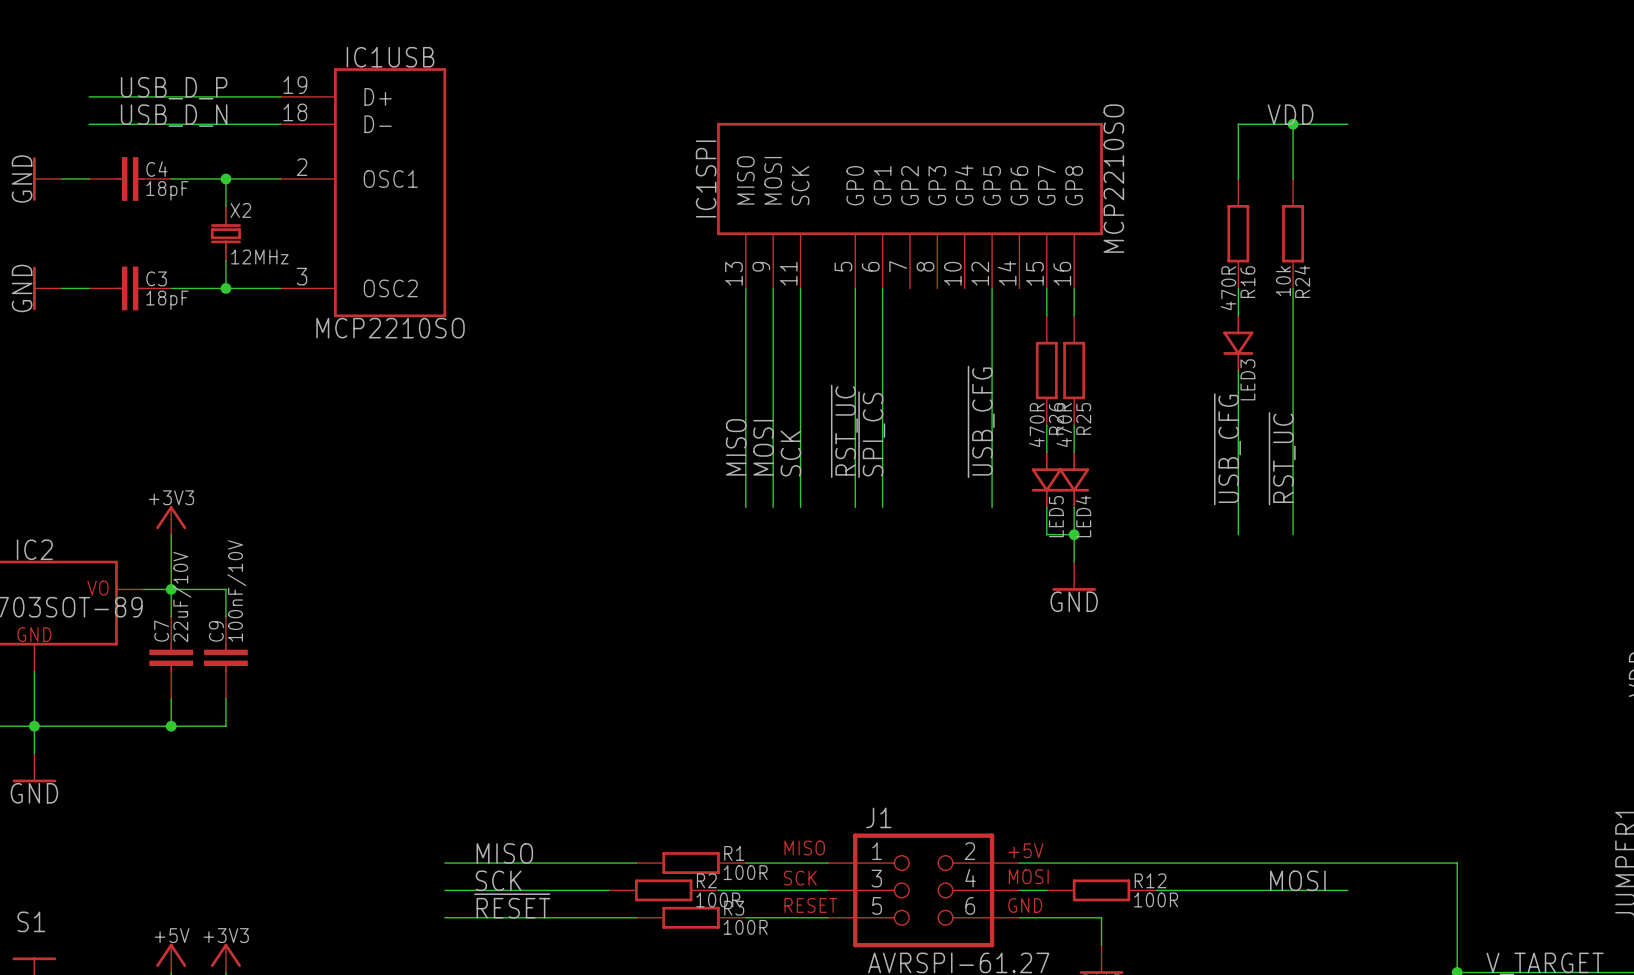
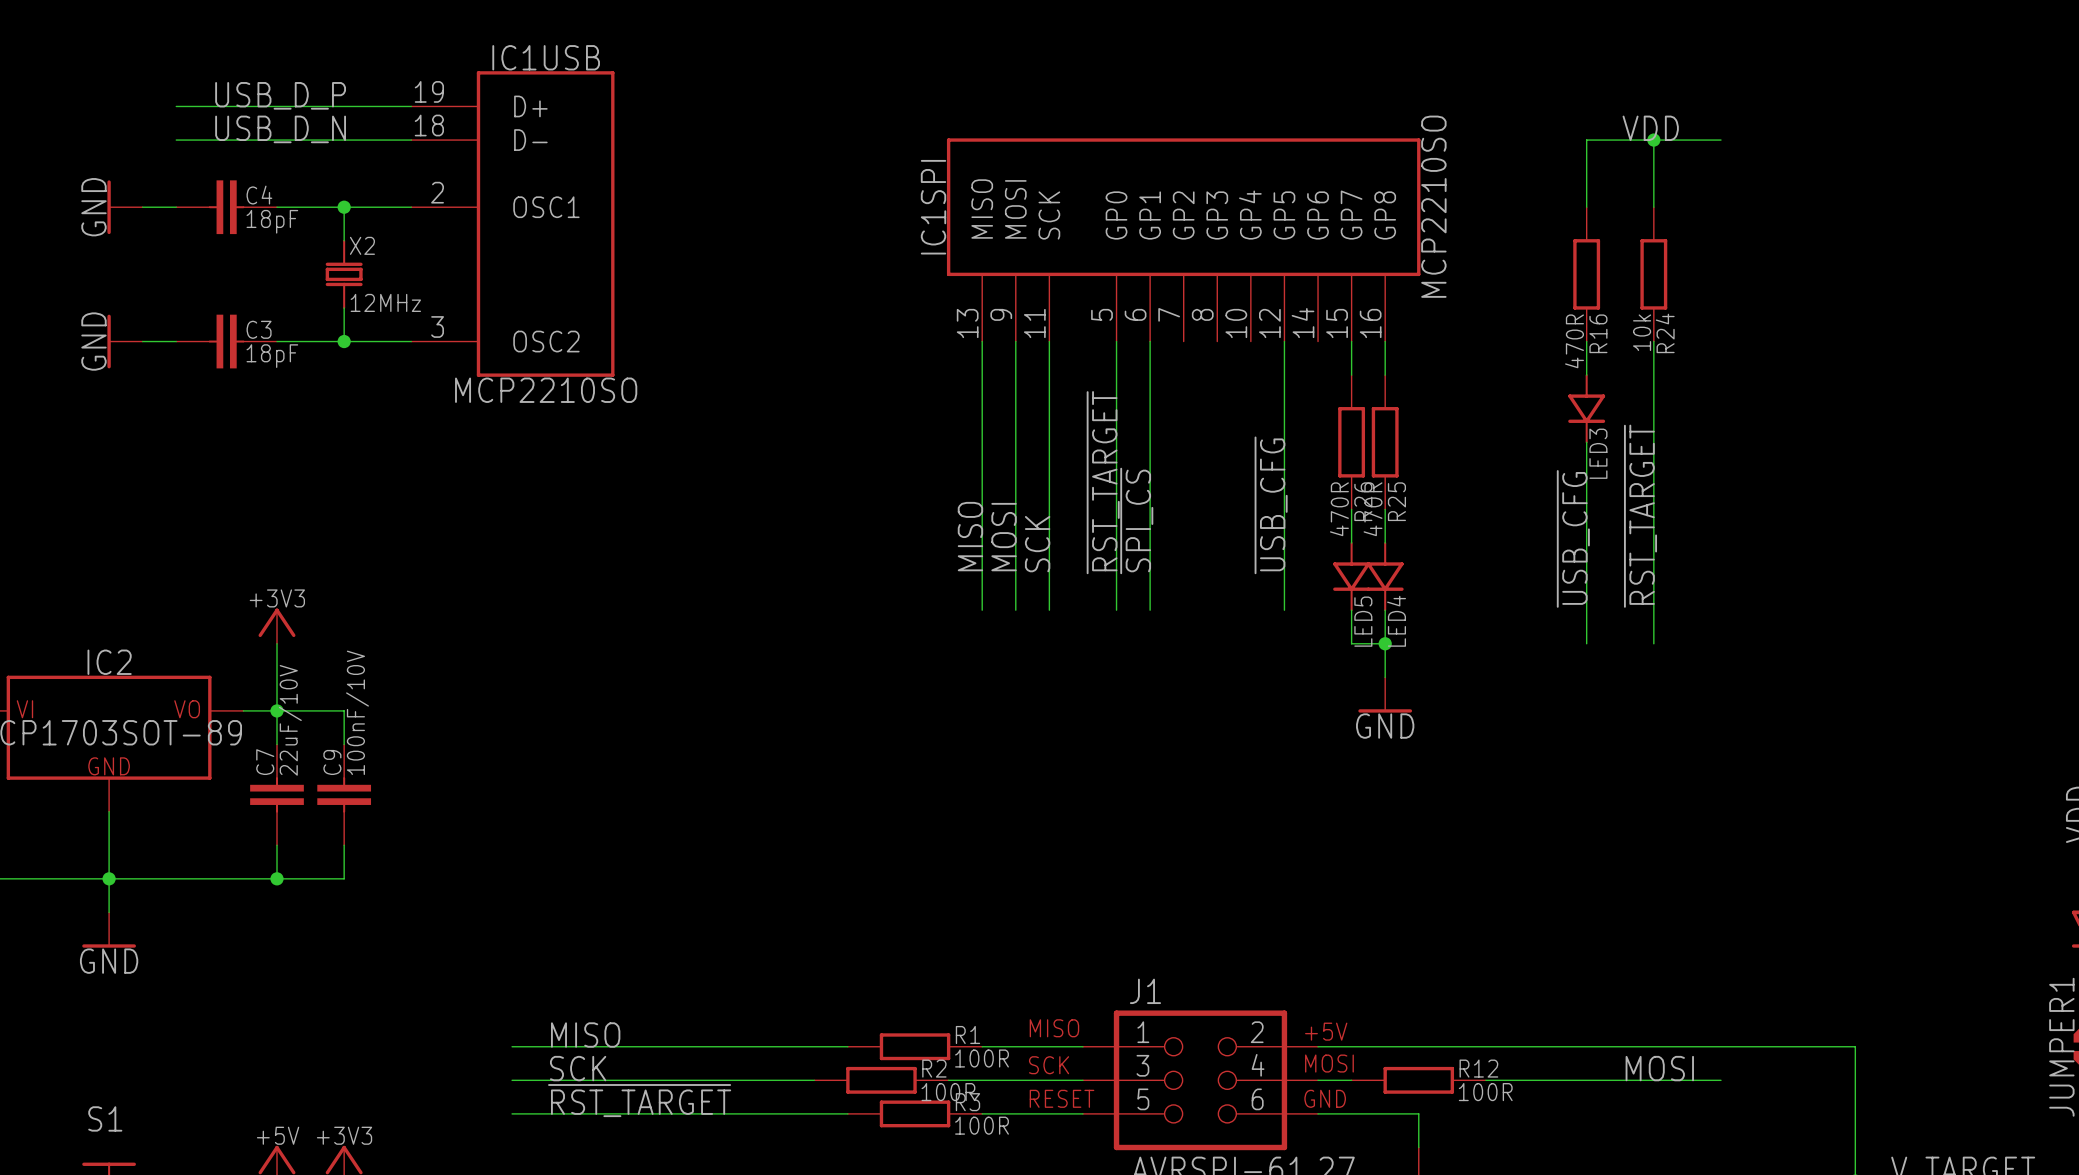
label: ~{RST_UC} (844, 431) -> ~{RST_TARGET} (1103, 482)
label: ~{RST_UC} (1282, 458) -> ~{RST_TARGET} (1640, 516)
label position: MISO (504, 853) -> MISO (585, 1034)
wire: none -> (512, 1046) (612, 1046)
label position: SCK (498, 880) -> SCK (578, 1068)
wire: none -> (512, 1080) (612, 1080)
label: ~{RESET} (512, 905) -> ~{RST_TARGET} (639, 1100)
wire: none -> (512, 1113) (612, 1113)

